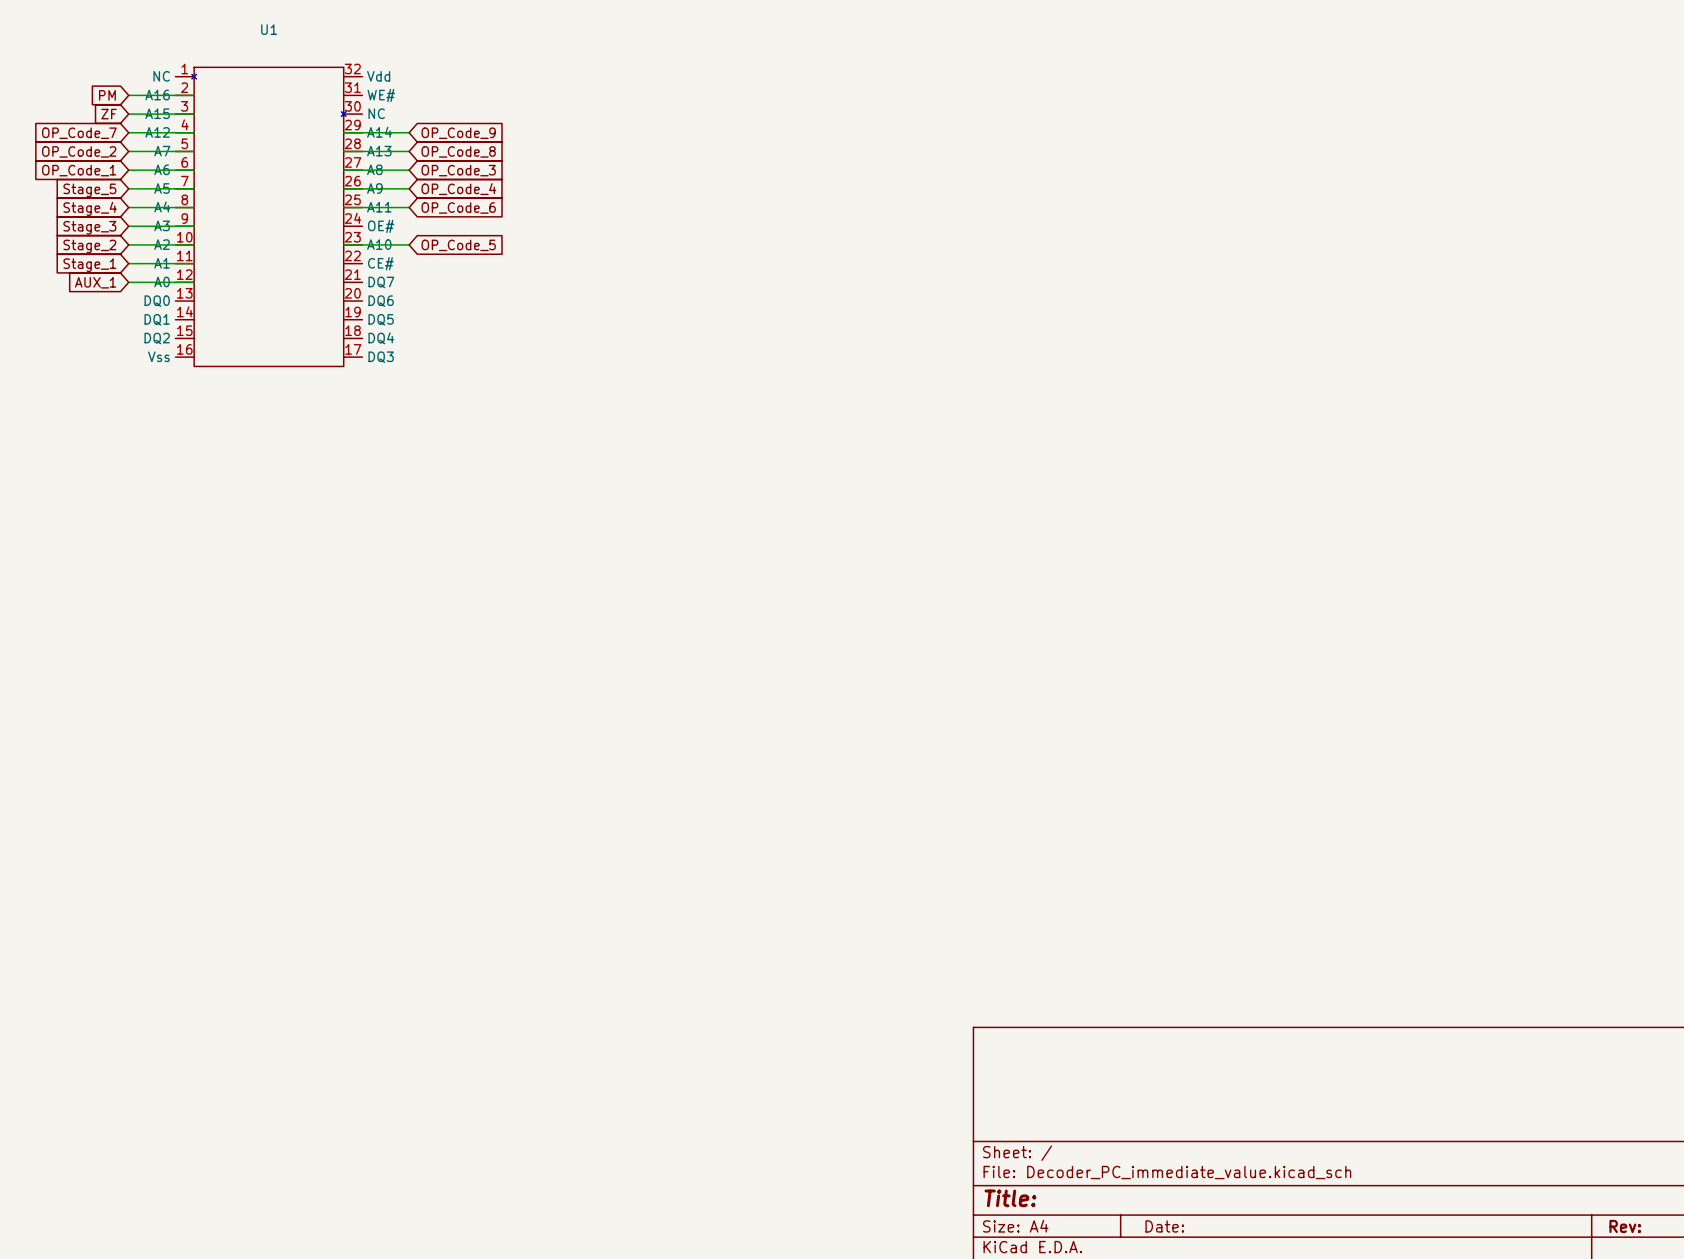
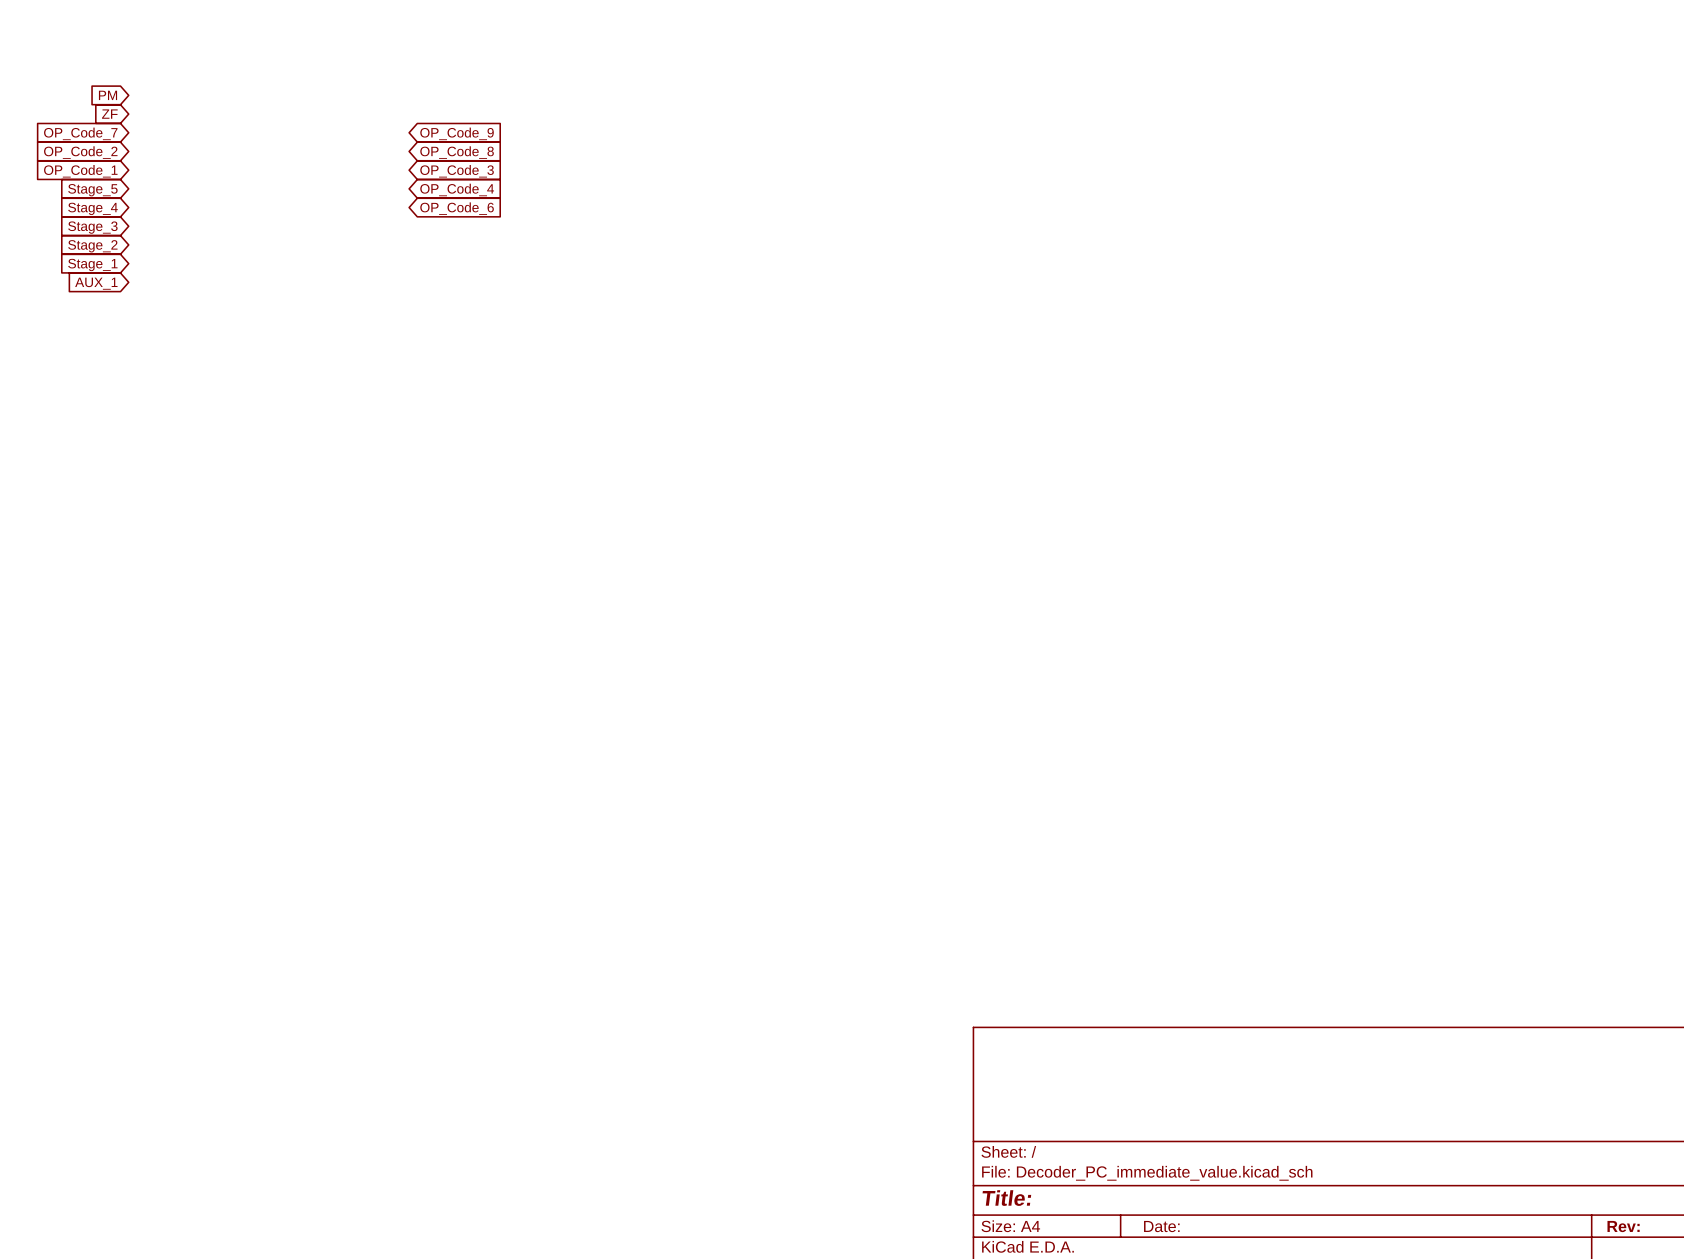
wire: (128, 95) (194, 95) -> none
wire: (128, 114) (194, 114) -> none
wire: (128, 132) (194, 132) -> none
wire: (343, 132) (409, 132) -> none
wire: (128, 151) (194, 151) -> none
wire: (343, 151) (409, 151) -> none
wire: (128, 170) (194, 170) -> none
wire: (343, 170) (409, 170) -> none
wire: (128, 188) (194, 188) -> none
wire: (343, 188) (409, 188) -> none
wire: (128, 207) (194, 207) -> none
wire: (343, 207) (409, 207) -> none
U1: (268, 216) -> none
wire: (128, 226) (194, 226) -> none
wire: (128, 244) (194, 244) -> none
wire: (343, 244) (409, 244) -> none
global label: OP_Code_5 (458, 245) -> none
wire: (128, 263) (194, 263) -> none
wire: (128, 282) (194, 282) -> none

